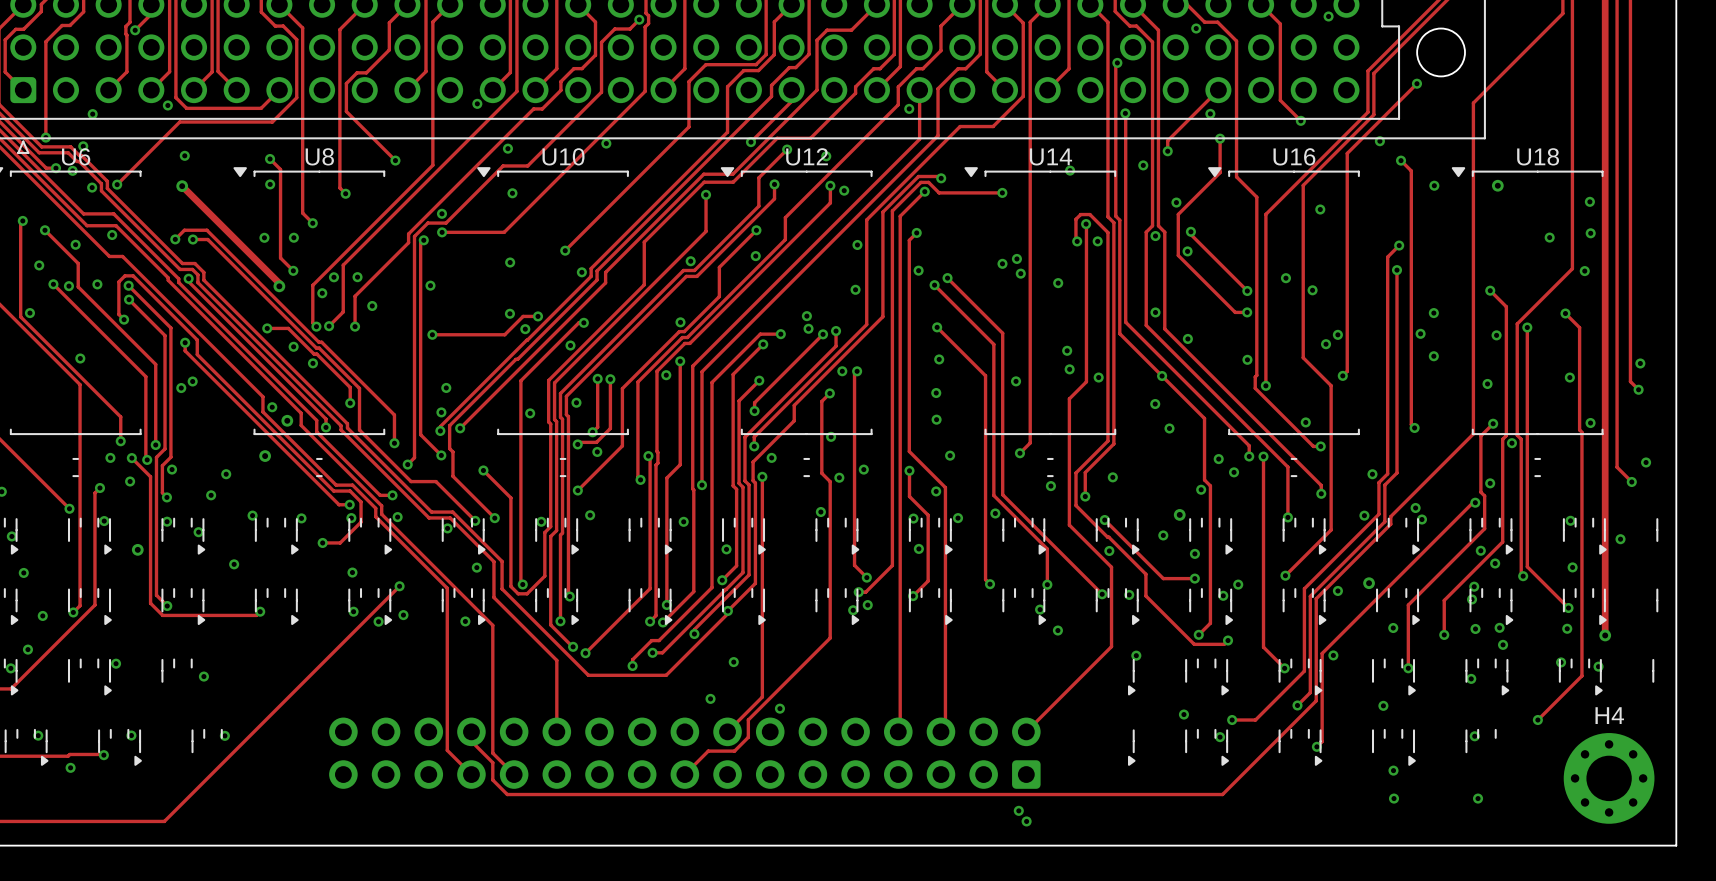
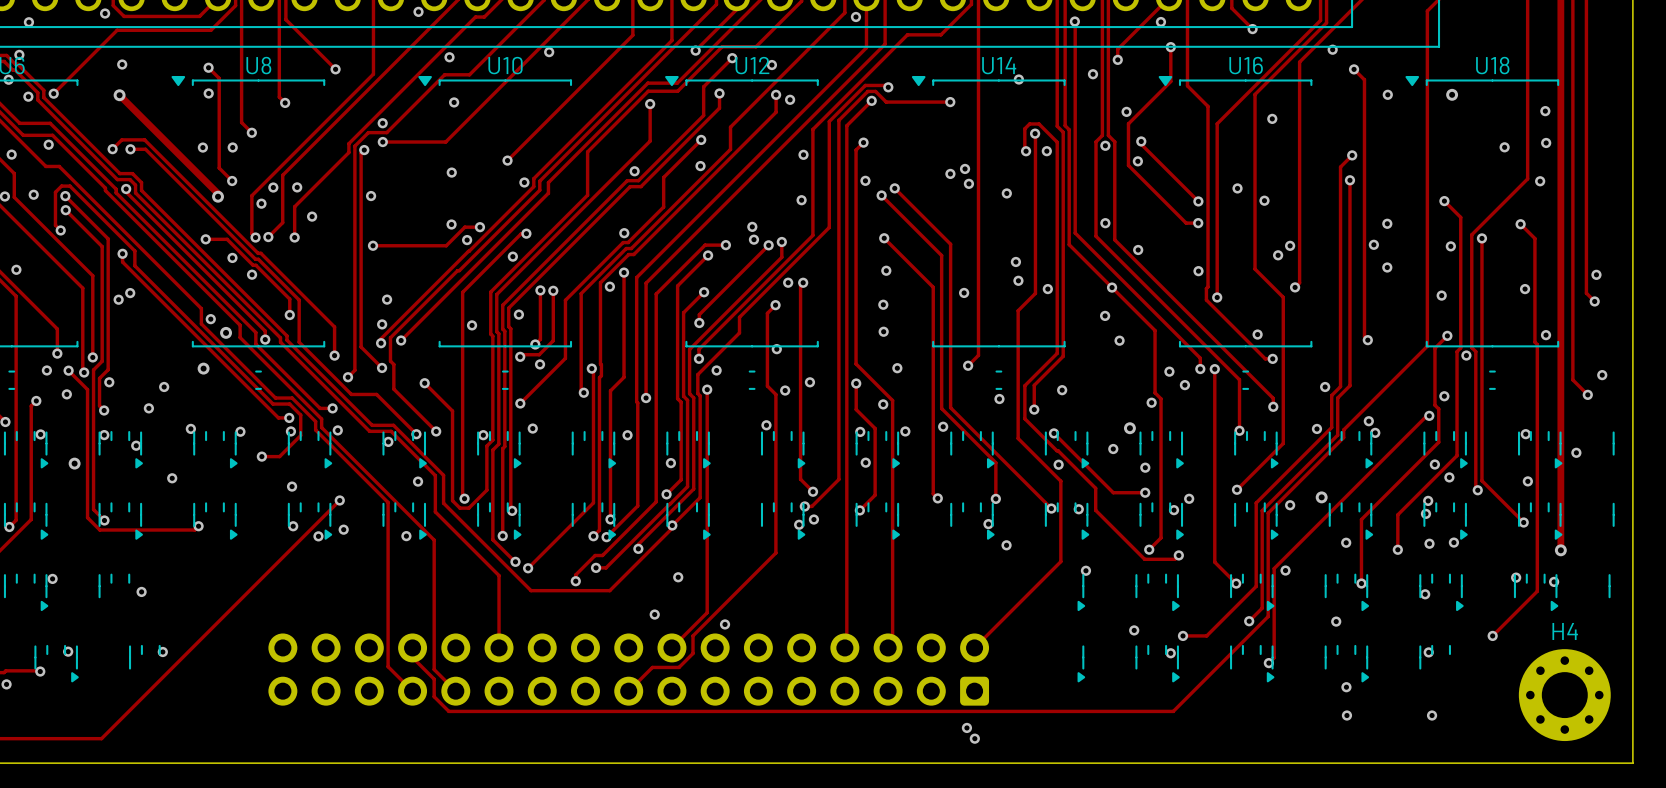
via: (1567, 628) -> none
via: (1503, 644) -> none

